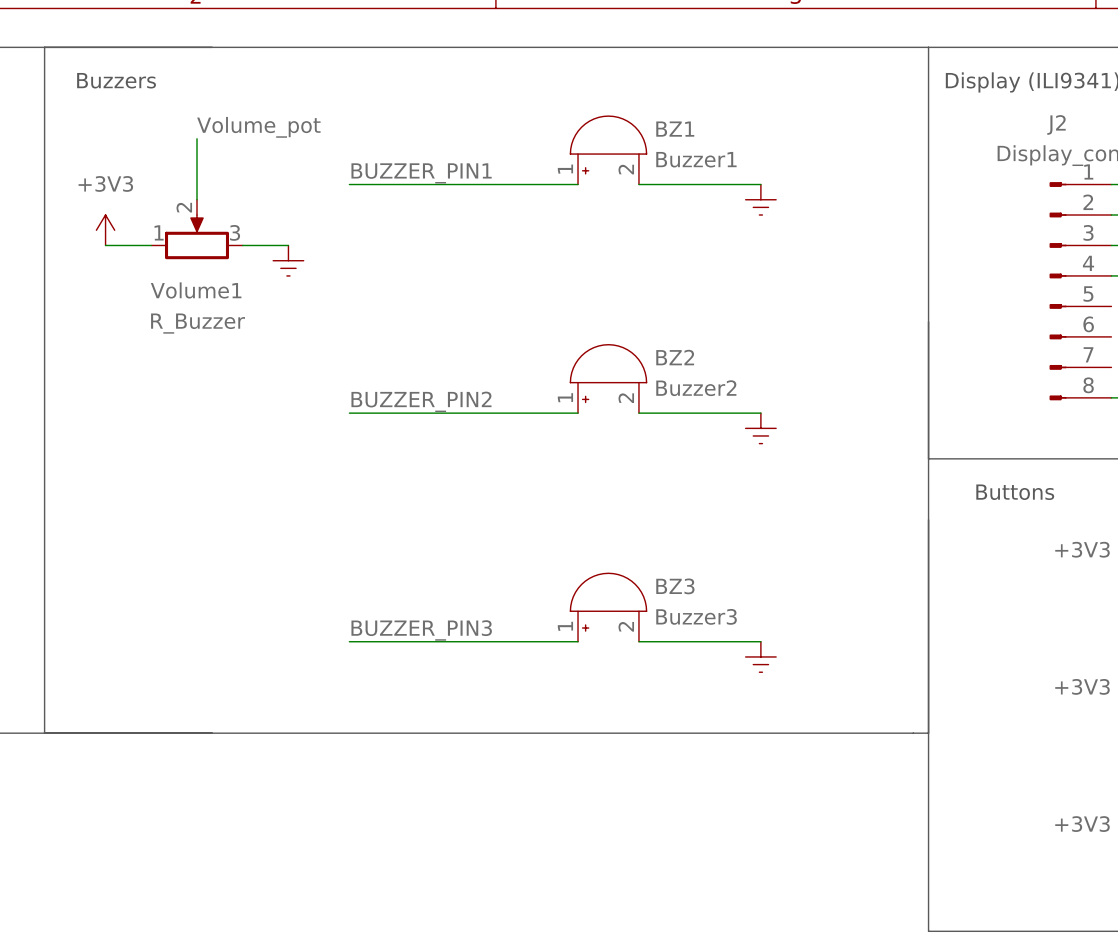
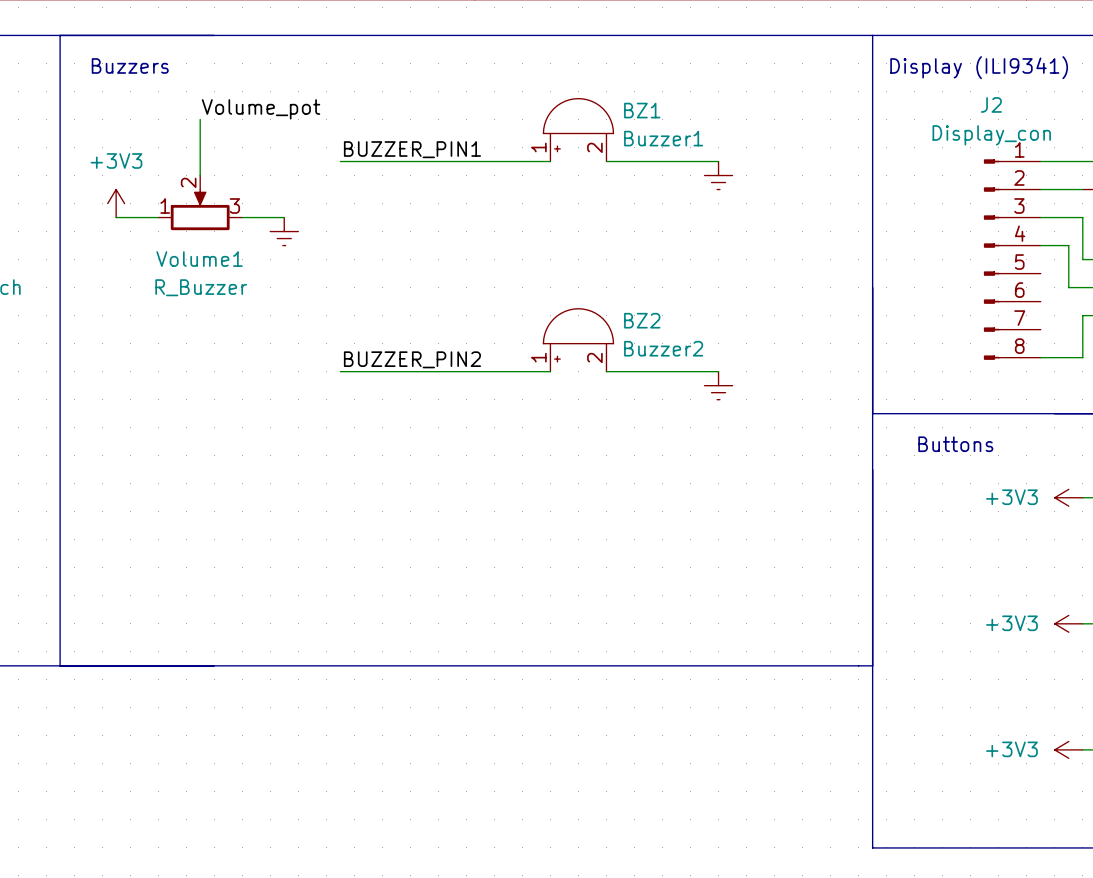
BZ3: Buzzer3 (608, 607) -> none
label: BUZZER_PIN3 (421, 630) -> none
wire: (349, 641) (578, 641) -> none
wire: (638, 641) (760, 641) -> none
power symbol: (760, 656) -> none

